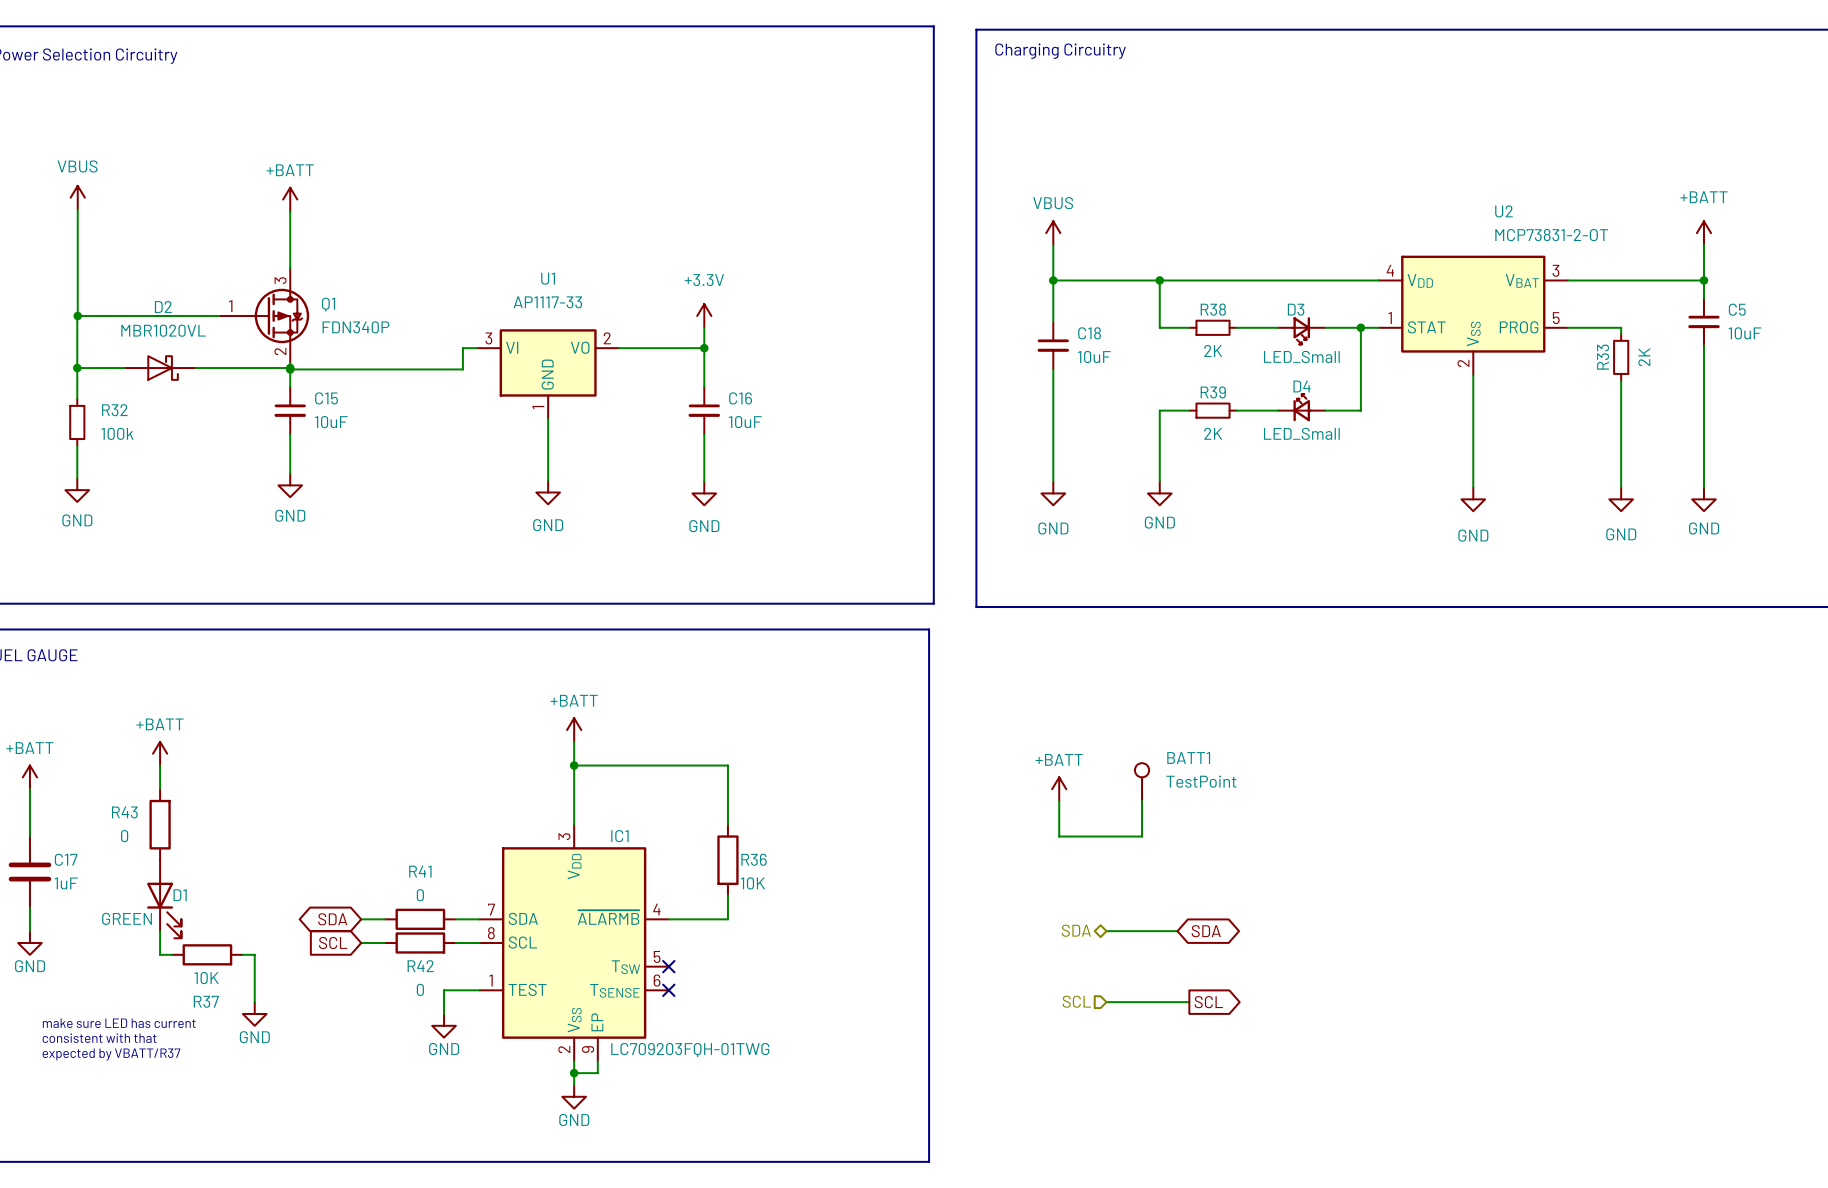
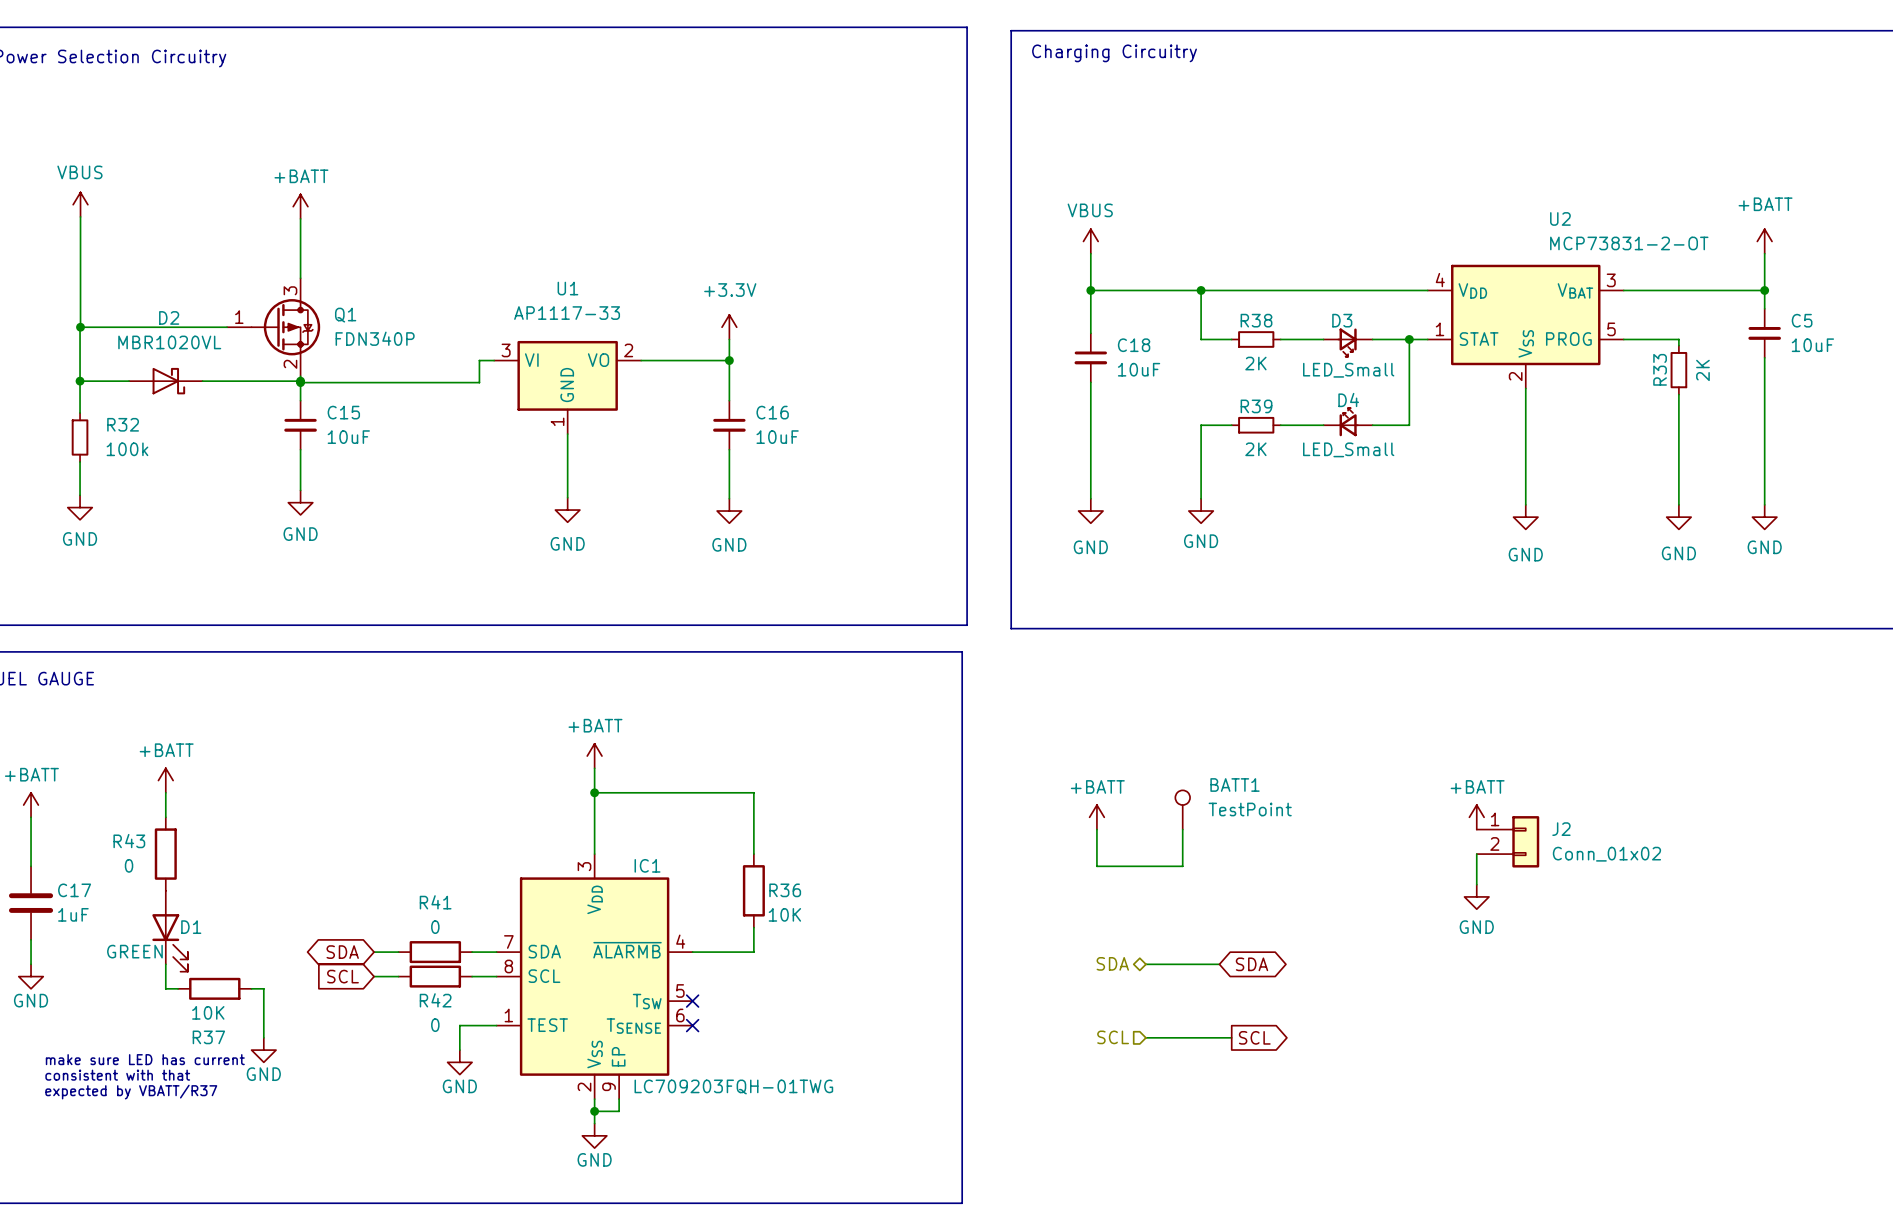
power symbol: none -> +BATT (1476, 817)
J2: none -> Conn_01x02 (1507, 841)
wire: none -> (1476, 854) (1476, 884)
power symbol: none -> GND (1476, 896)

